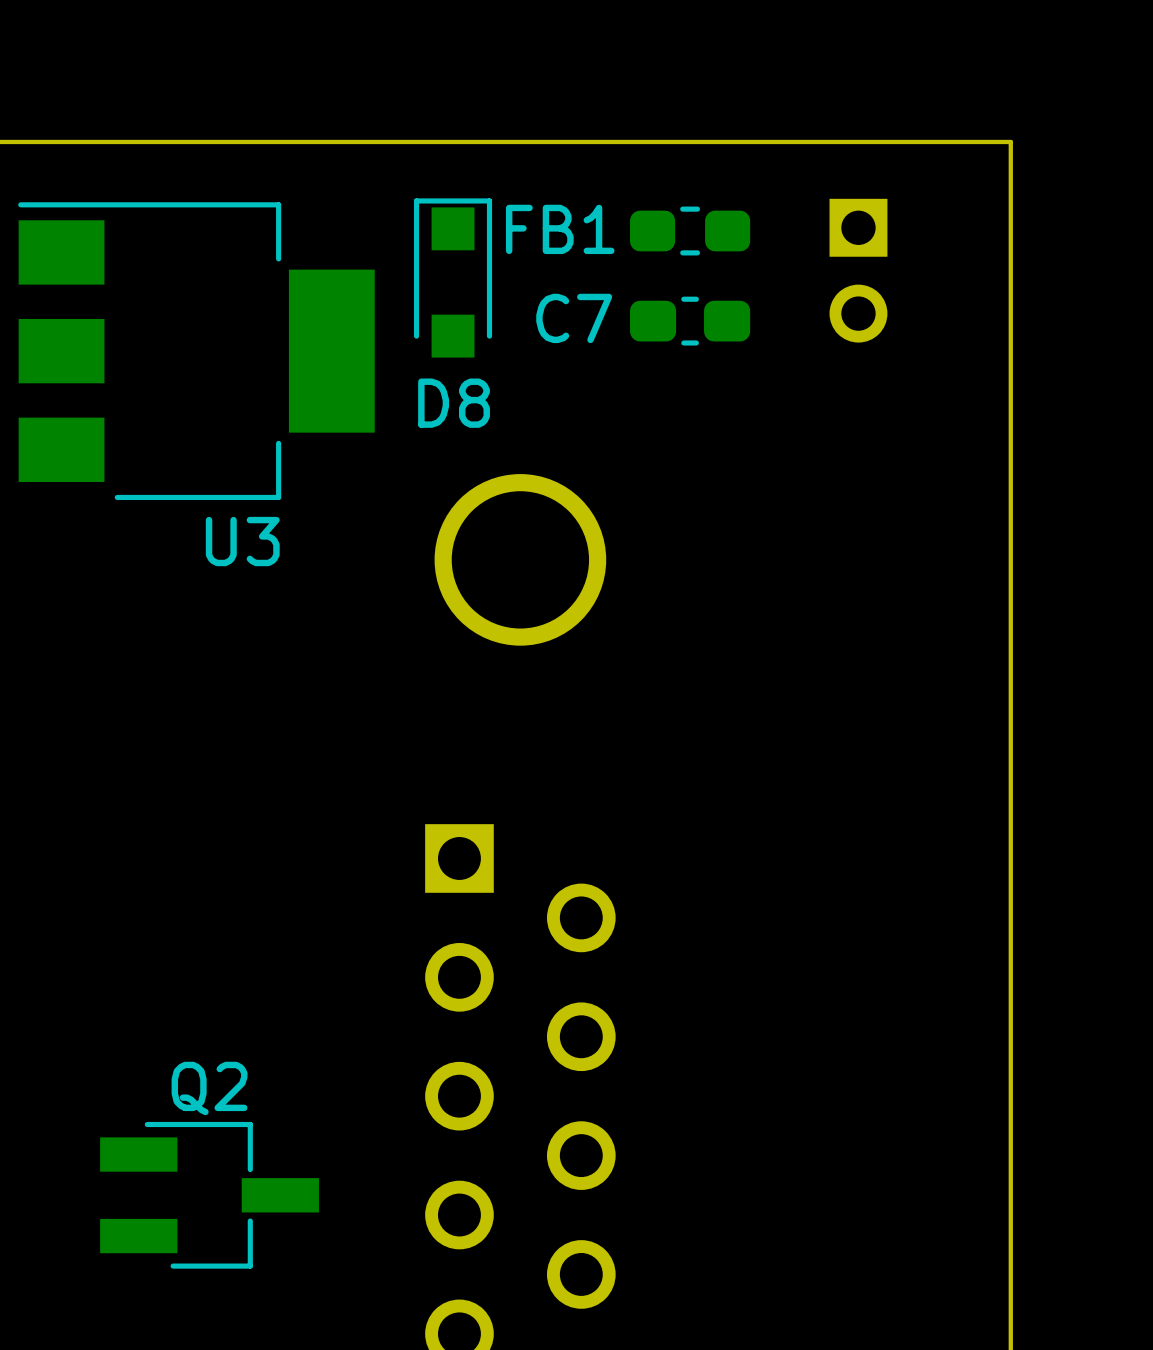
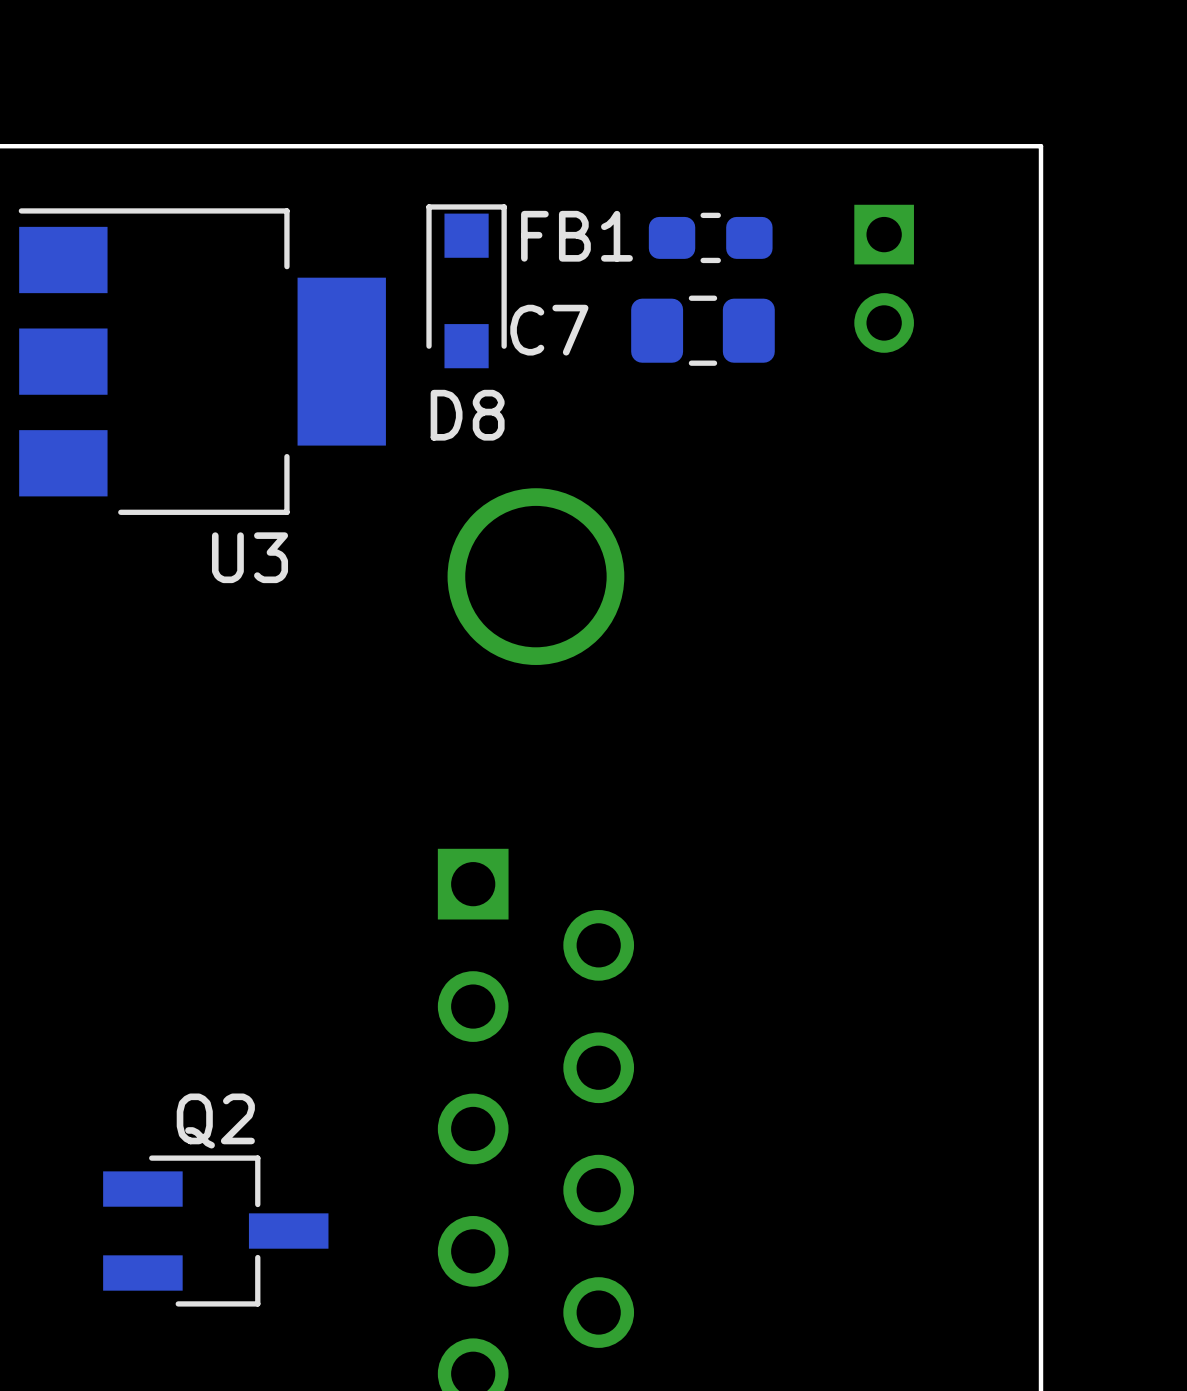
C7 footprint: [630, 296, 751, 346] -> [631, 295, 775, 366]
C7 name position: C7 (574, 318) -> C7 (549, 330)

